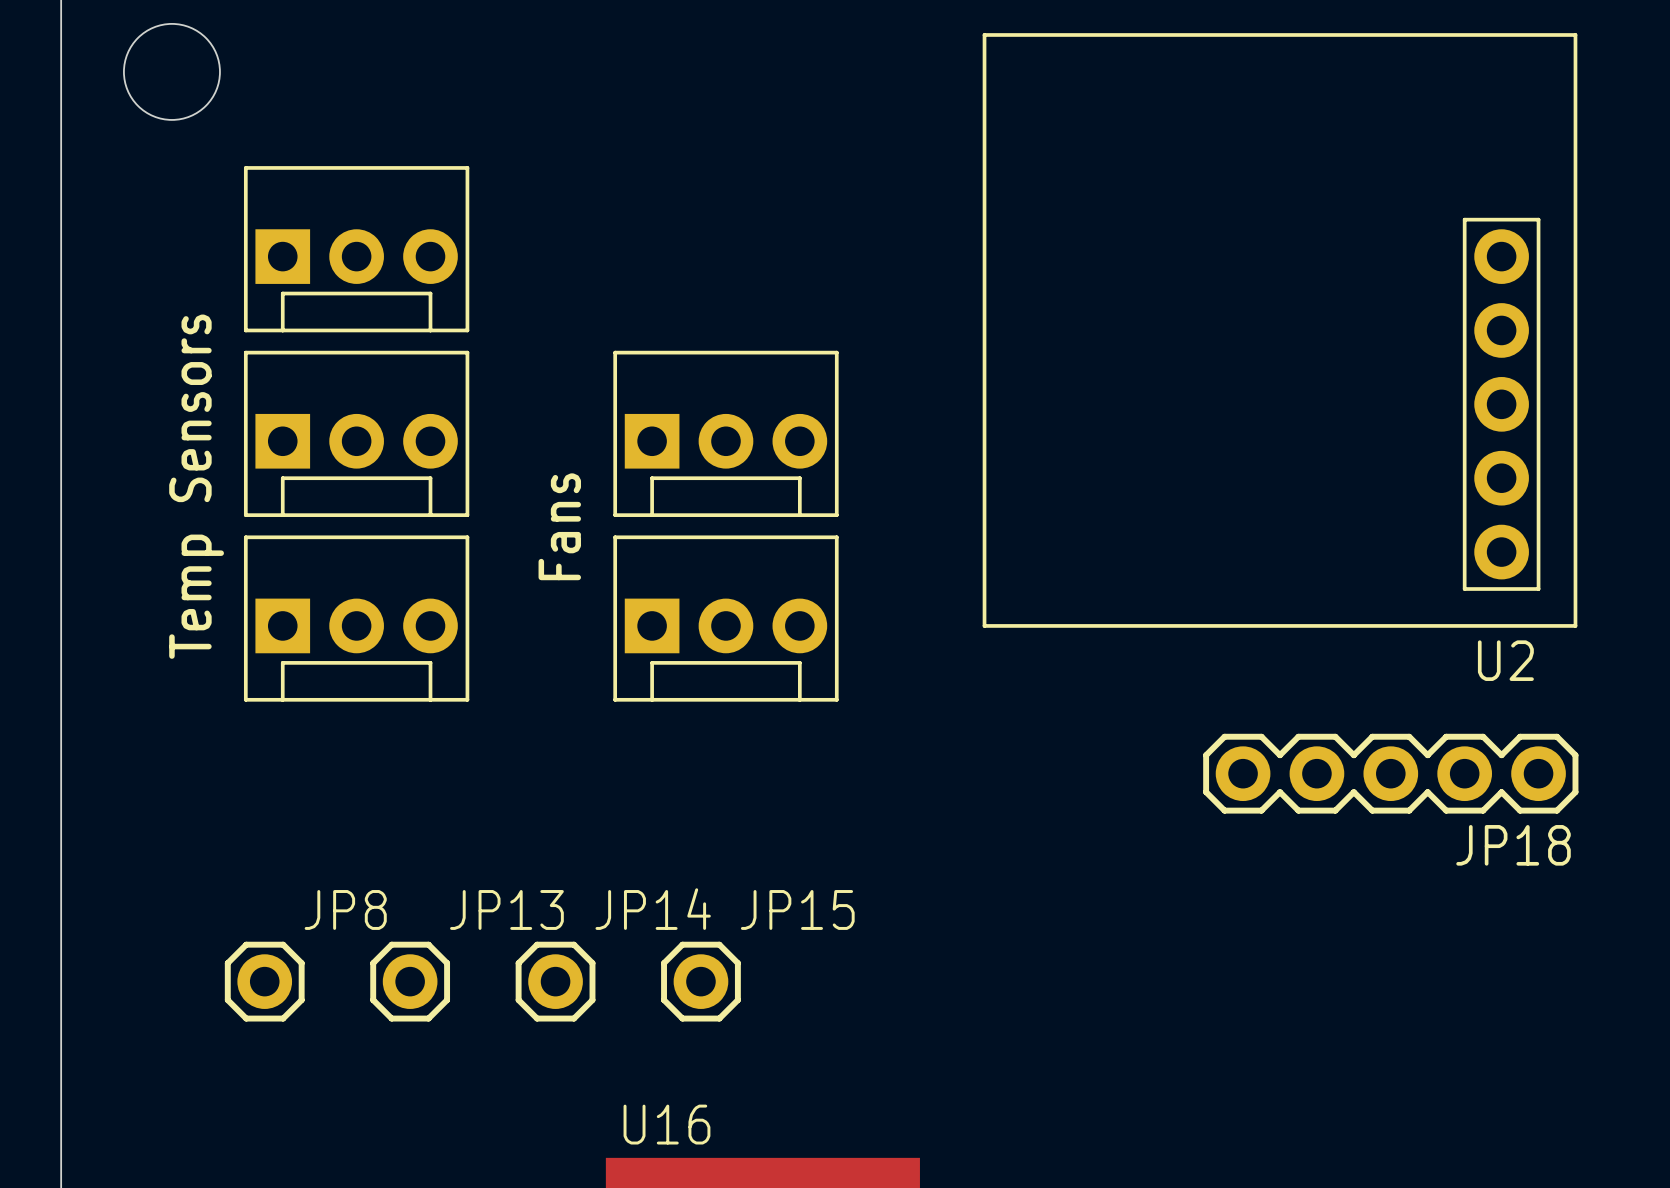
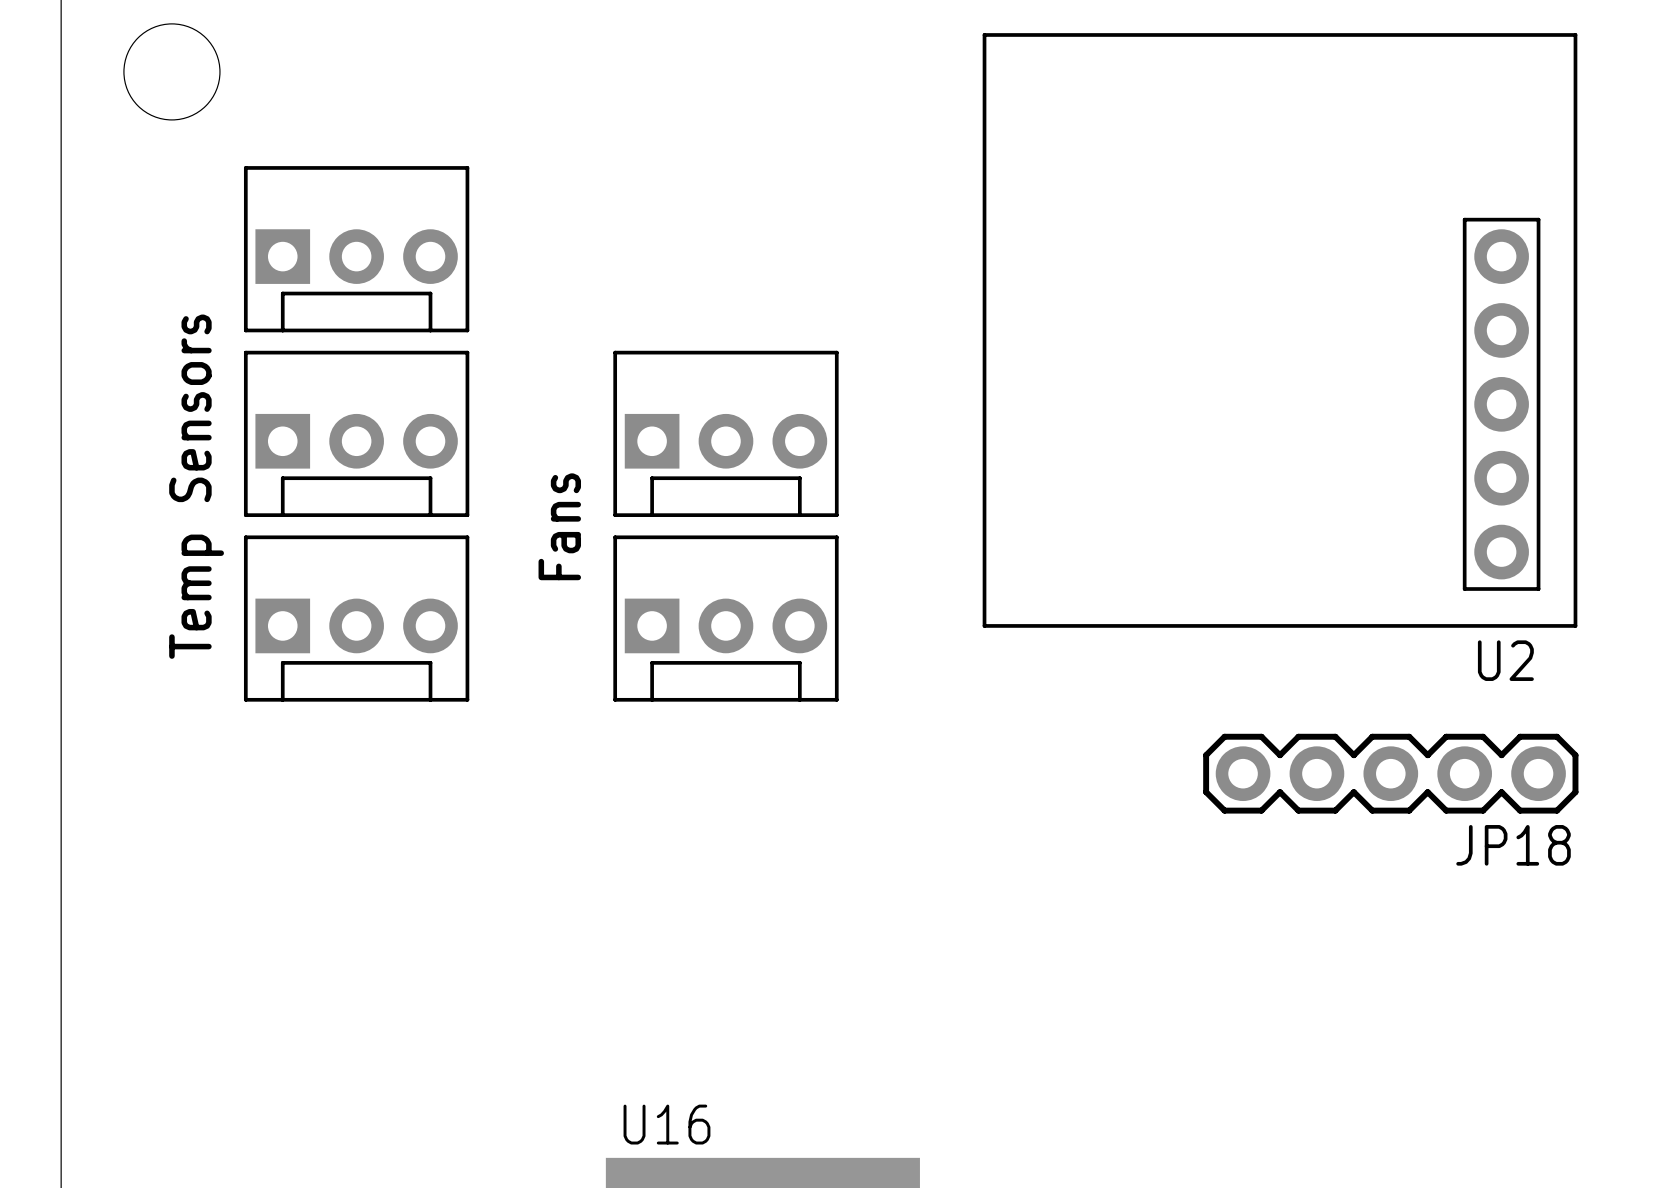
JP8: (264, 981) -> none
JP13: (410, 981) -> none
JP14: (555, 981) -> none
JP15: (700, 981) -> none

